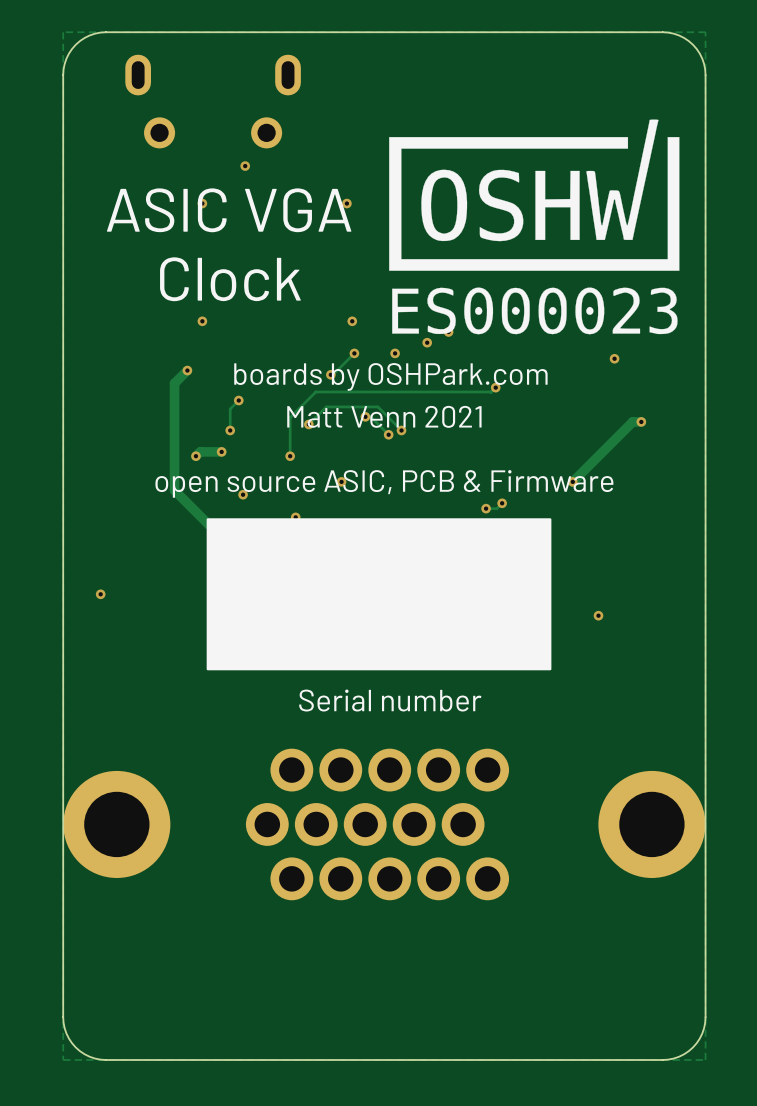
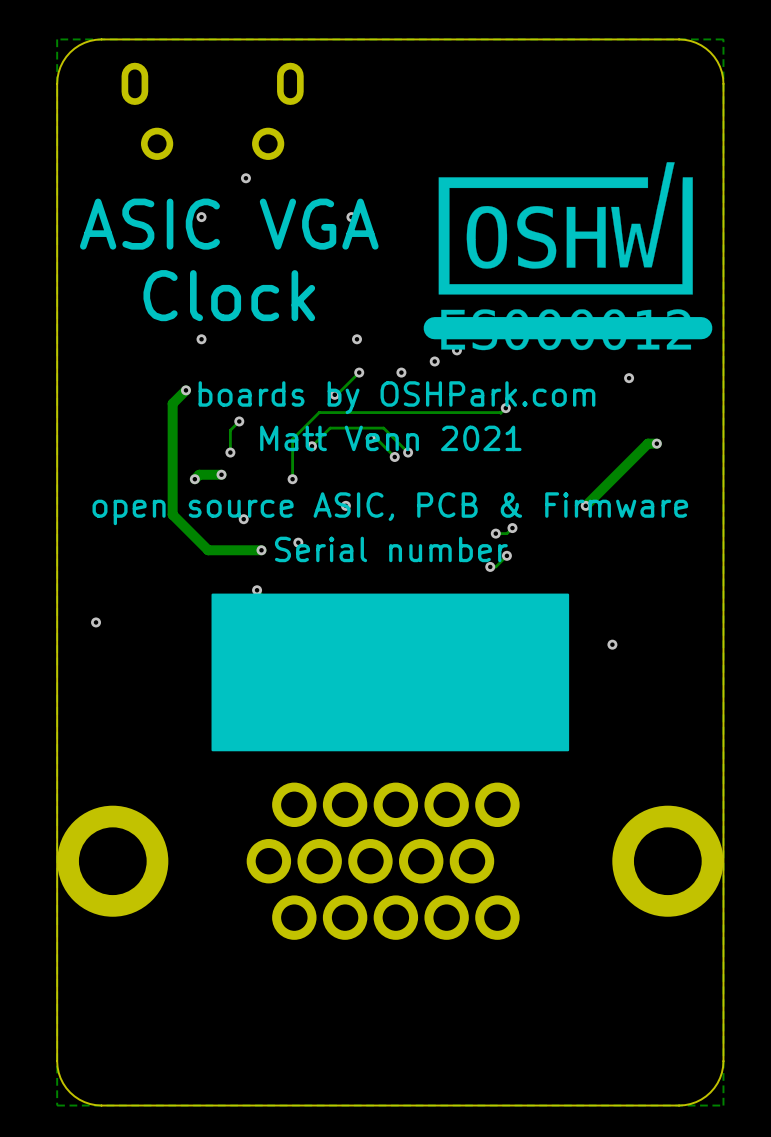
drawing: [389, 119, 680, 335] -> none
drawing: none -> [438, 162, 693, 351]
line: none -> (701, 328) (434, 328)
drawing position: (379, 594) -> (390, 672)
text position: Serial number (390, 700) -> Serial number (391, 549)

